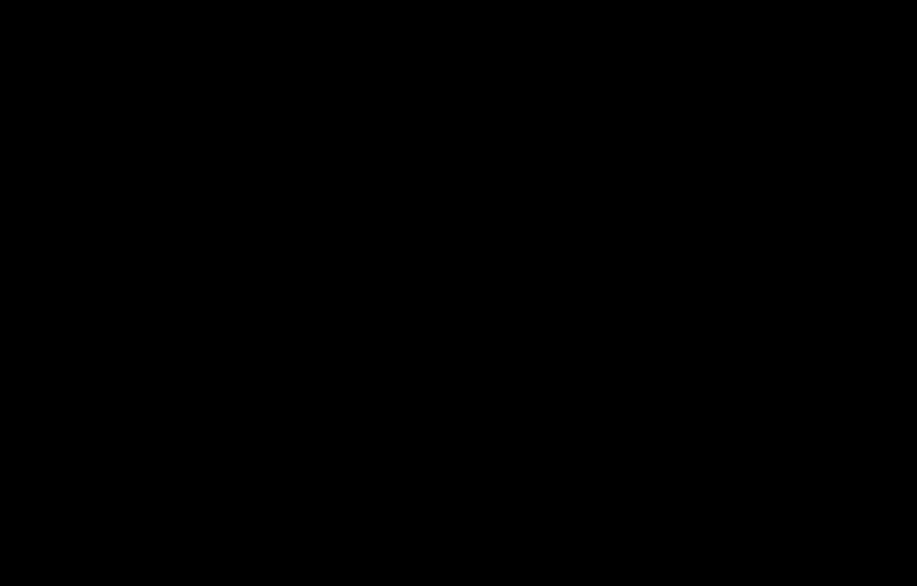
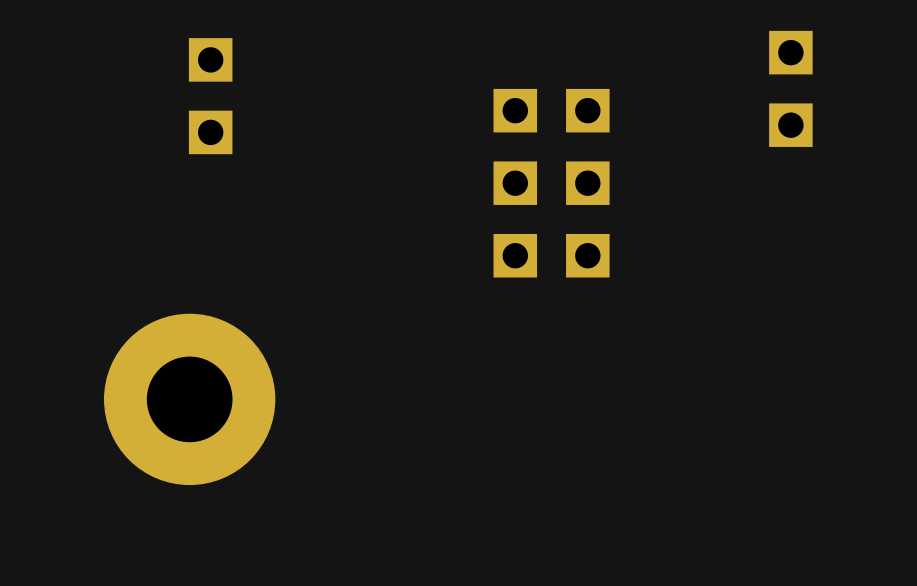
part: none -> (790, 88)
part: none -> (210, 96)
part: none -> (551, 183)
part: none -> (189, 399)

